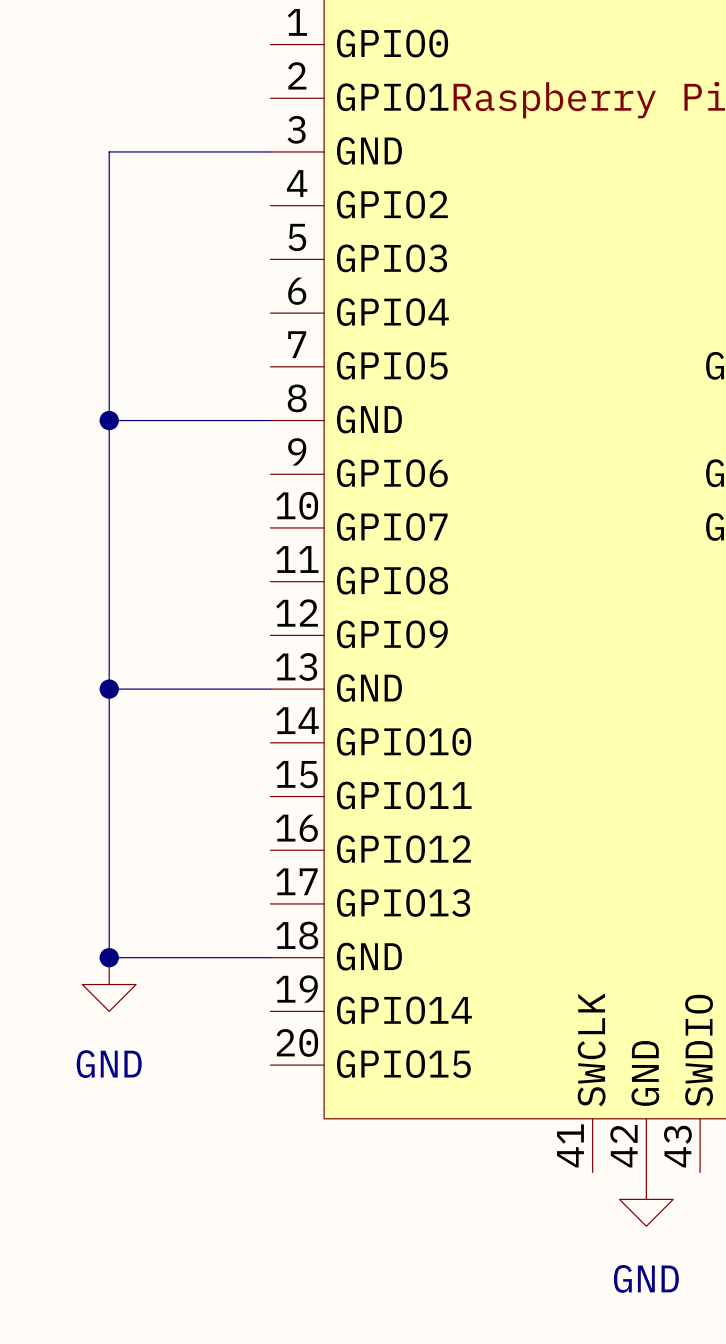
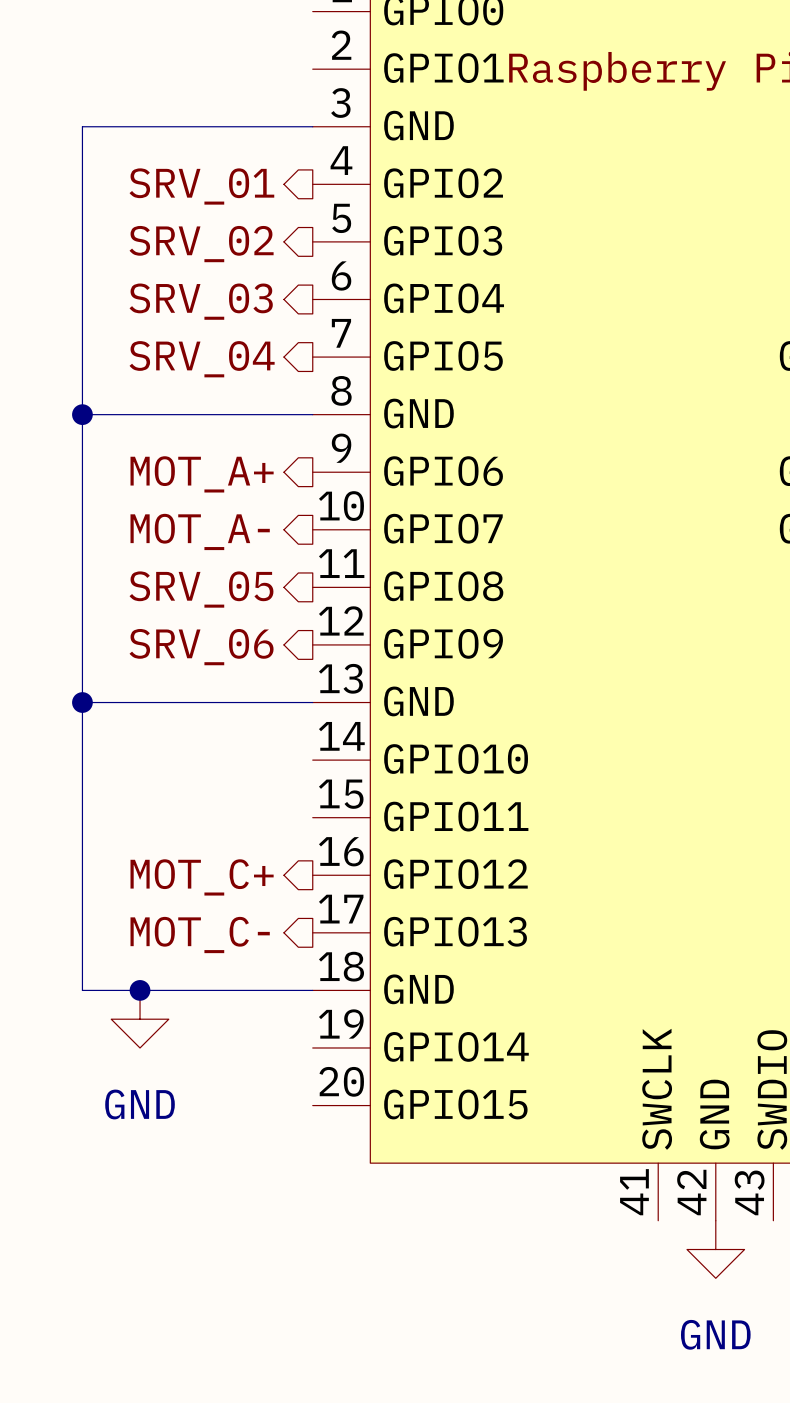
wire: (109, 151) (109, 957) -> (140, 126) (82, 126) (82, 990) (140, 990)
hierarchical label: none -> SRV_01 (201, 186)
hierarchical label: none -> SRV_02 (201, 244)
hierarchical label: none -> SRV_03 (201, 301)
hierarchical label: none -> SRV_04 (202, 359)
wire: none -> (82, 414) (140, 414)
junction position: (109, 420) -> (82, 414)
hierarchical label: none -> MOT_A+ (202, 474)
hierarchical label: none -> MOT_A- (200, 531)
hierarchical label: none -> SRV_05 (201, 589)
hierarchical label: none -> SRV_06 (201, 647)
wire: none -> (82, 702) (140, 702)
junction position: (109, 689) -> (82, 702)
hierarchical label: none -> MOT_C+ (202, 877)
hierarchical label: none -> MOT_C- (200, 935)

